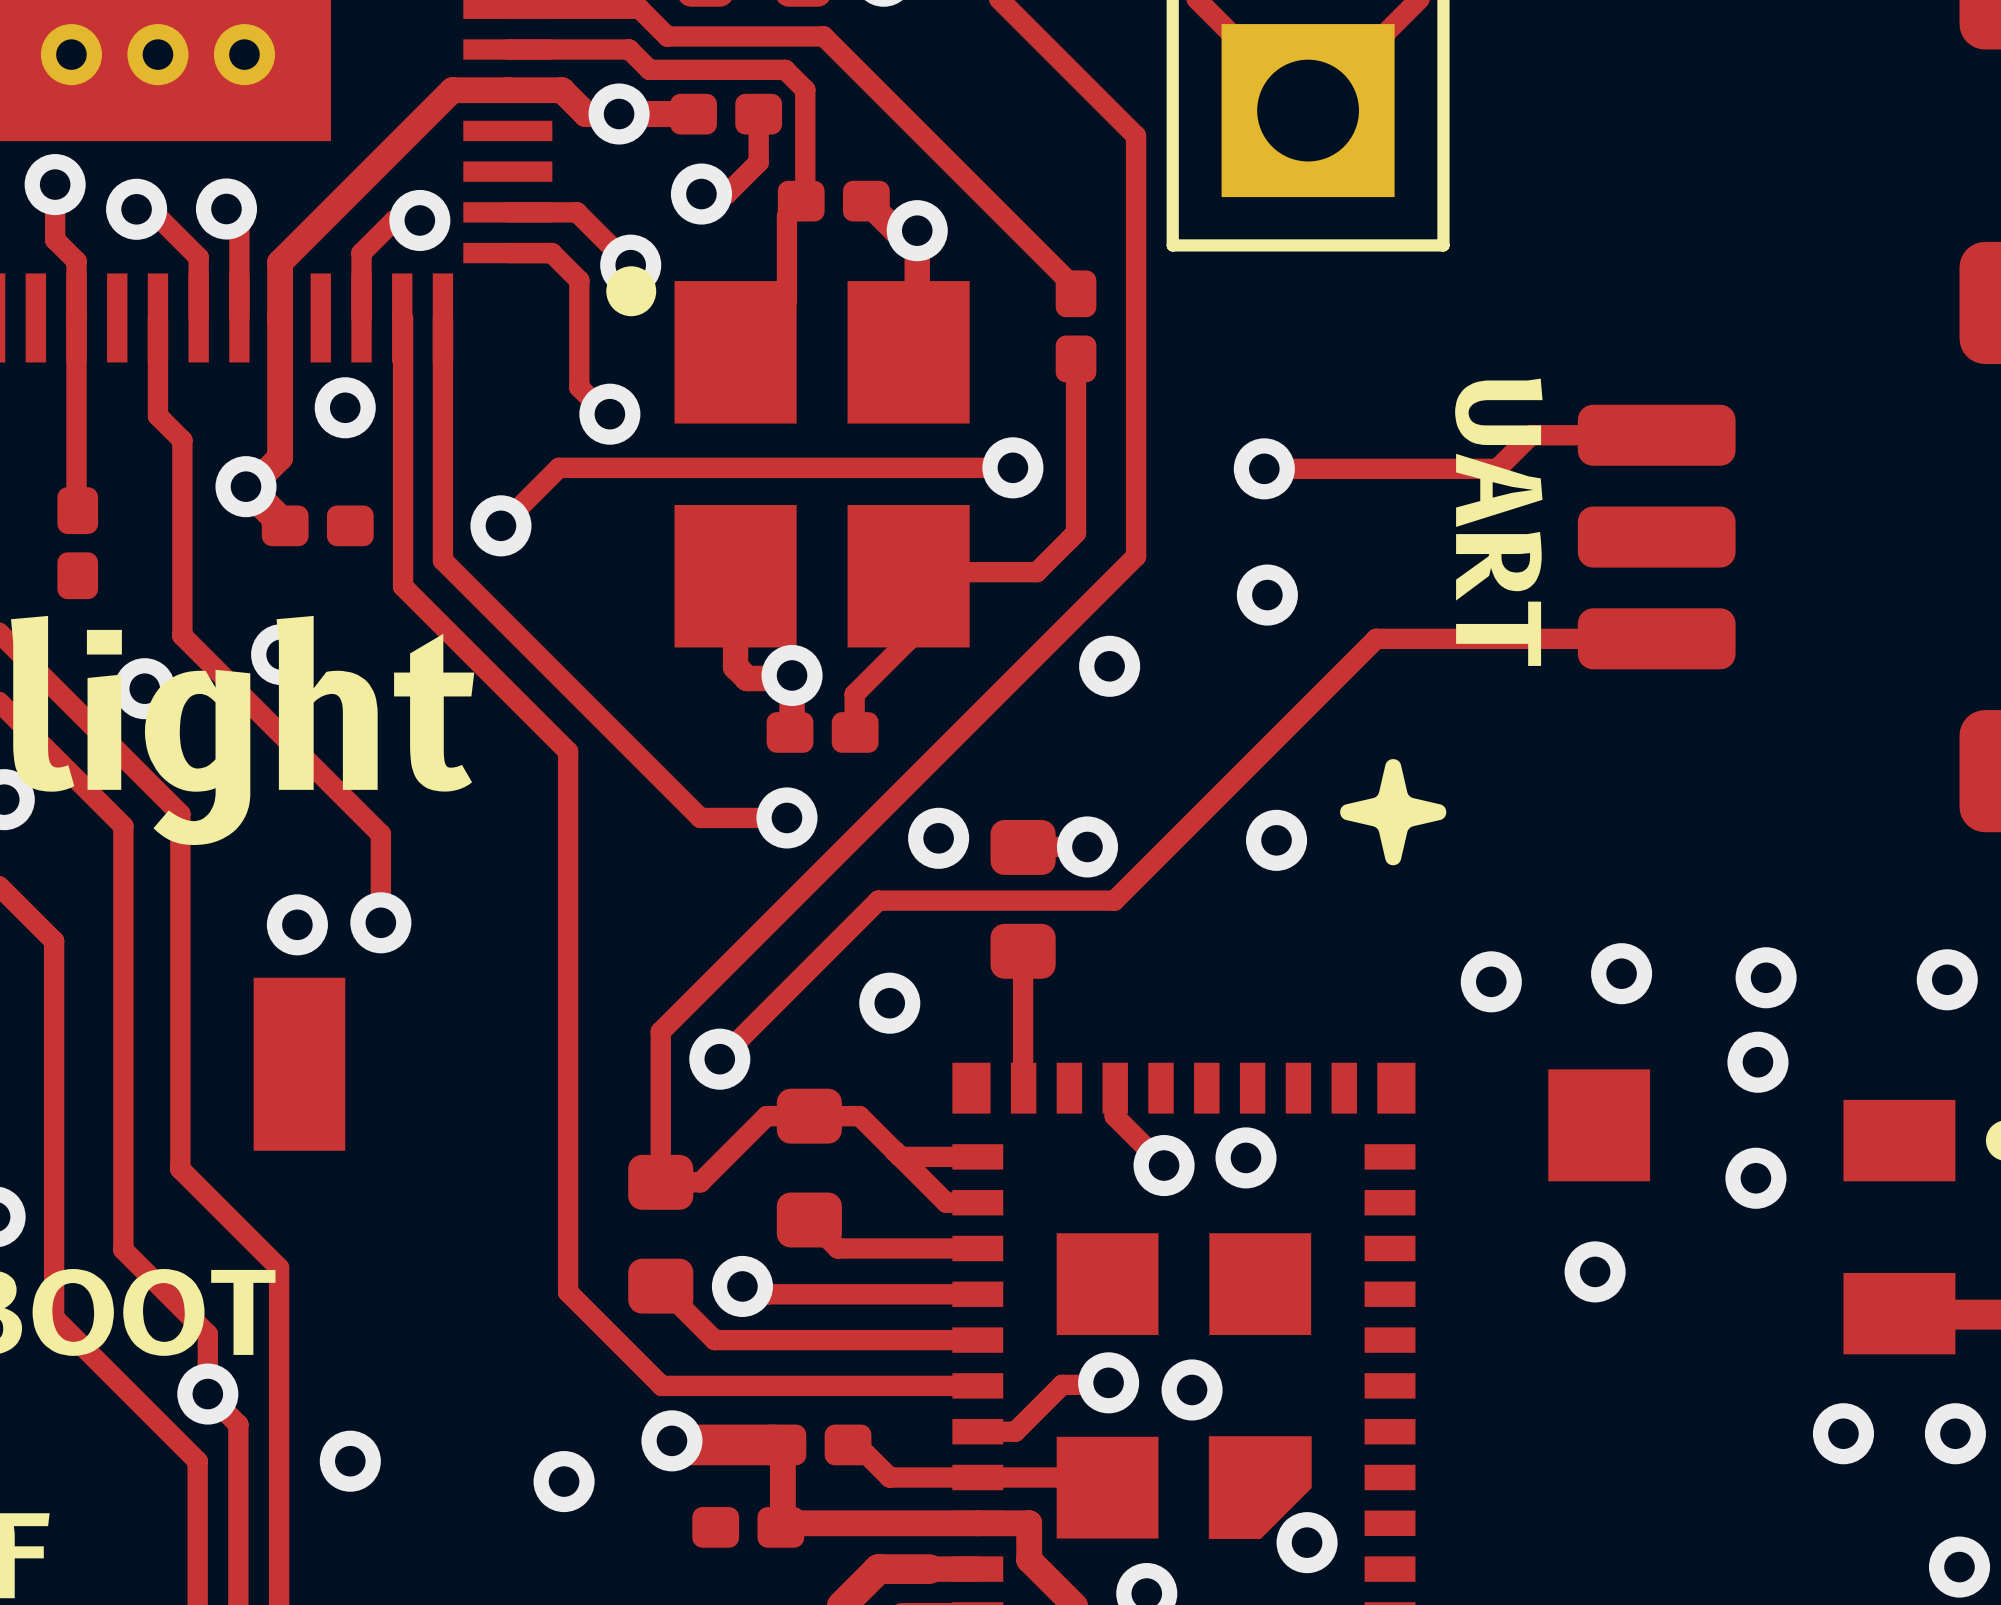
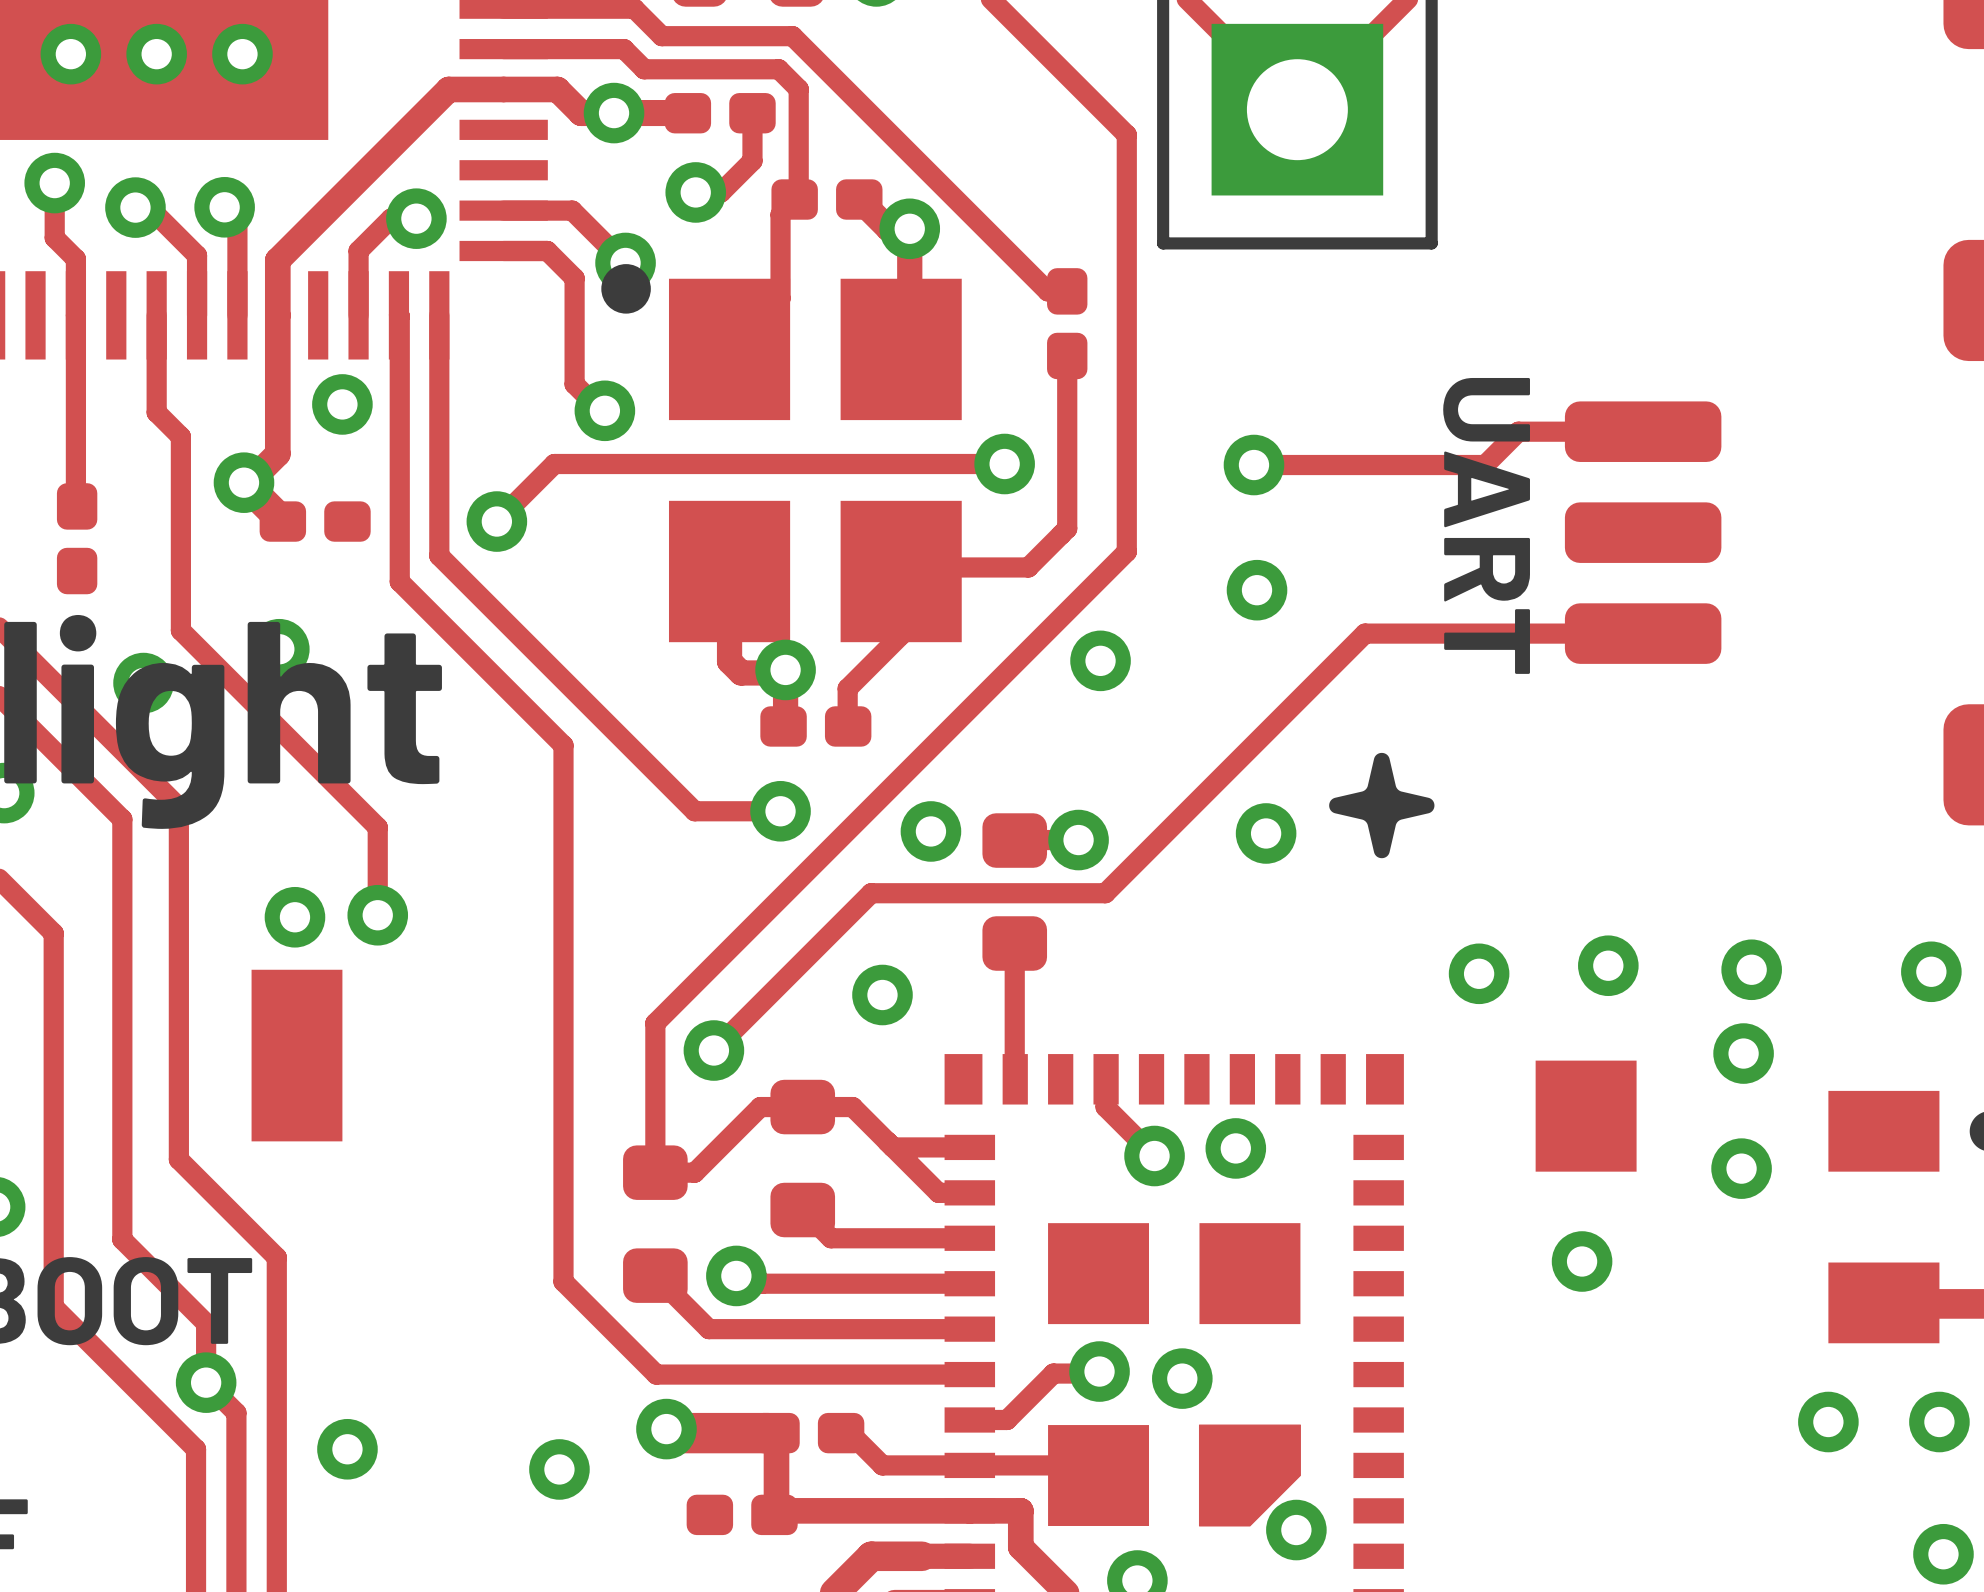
track: (799, 36) (823, 36) (1076, 288) (1076, 293) -> (792, 36) (1047, 291) (1067, 291)

